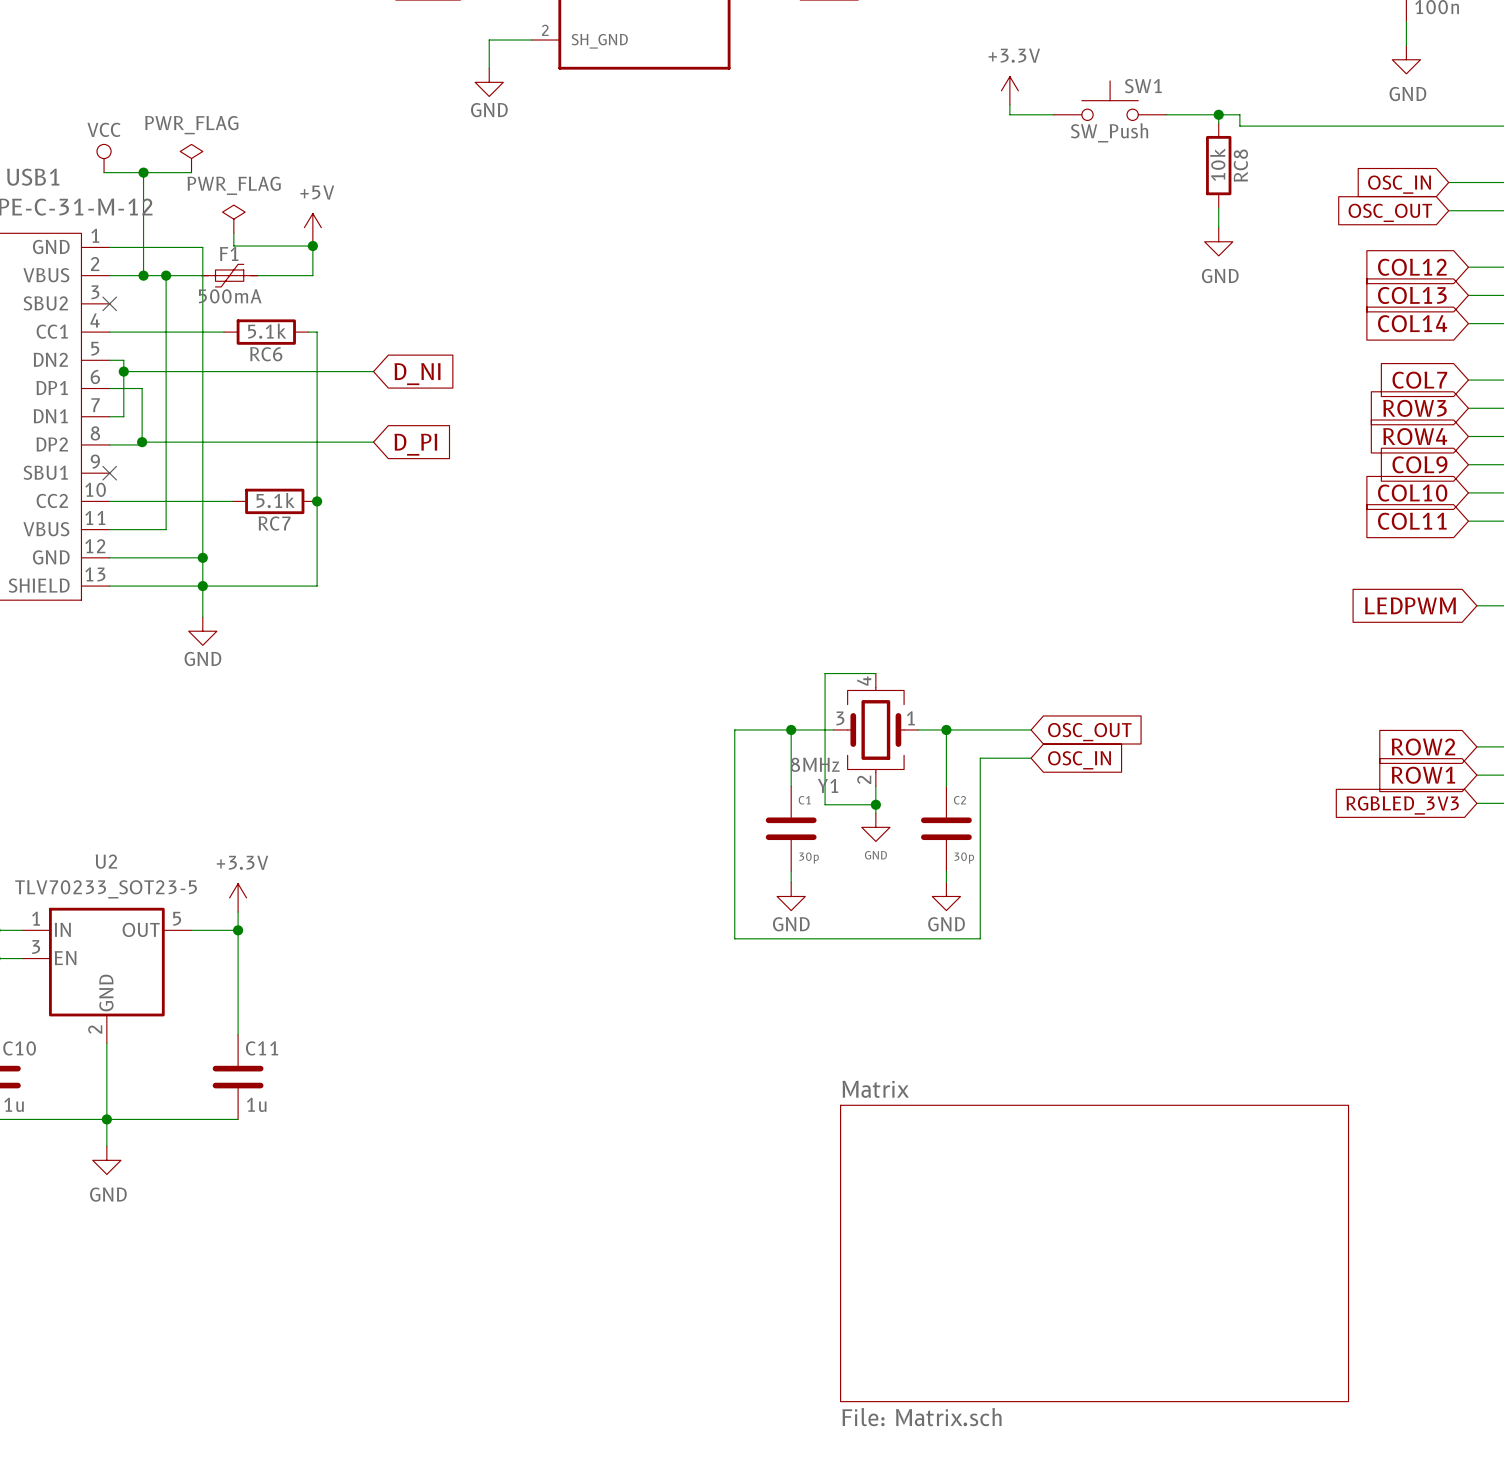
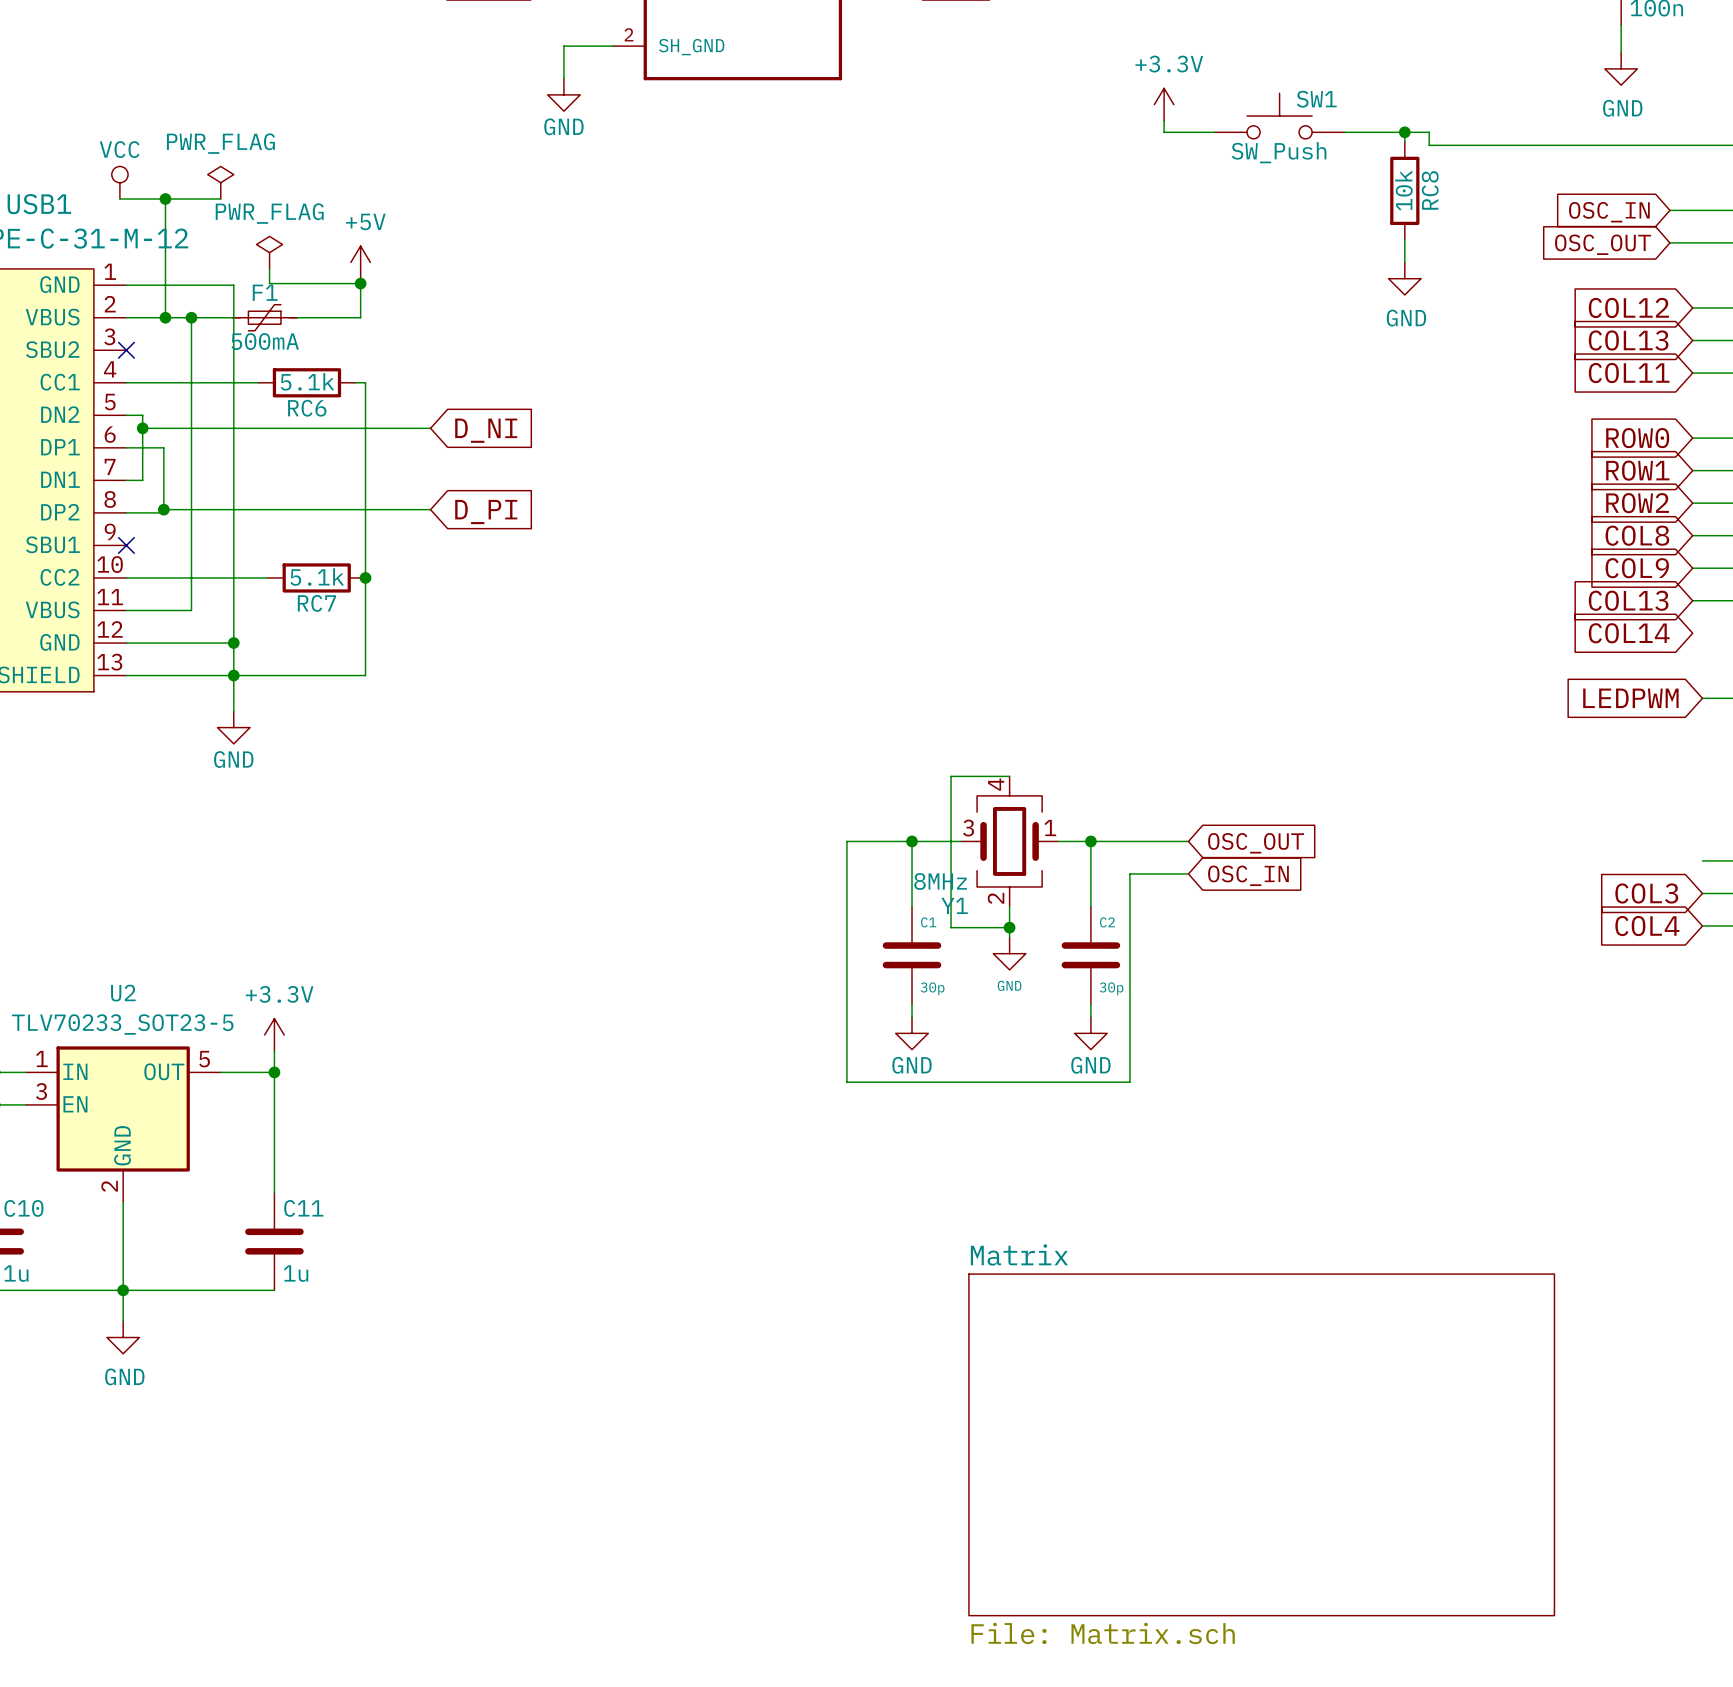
global label: COL14 (1412, 323) -> COL11 (1629, 373)
global label: COL7 (1419, 380) -> ROW0 (1637, 438)
global label: ROW3 (1414, 408) -> ROW1 (1637, 470)
global label: ROW4 (1415, 436) -> ROW2 (1637, 503)
global label: COL9 (1419, 464) -> COL8 (1637, 535)
global label: COL10 (1412, 493) -> COL9 (1637, 568)
global label: COL11 (1412, 521) -> COL13 (1628, 600)
global label: none -> COL14 (1629, 633)
global label: ROW2 (1423, 747) -> none
global label: ROW1 (1423, 775) -> COL3 (1646, 893)
global label: RGBLED_3V3 (1402, 805) -> COL4 (1647, 926)

